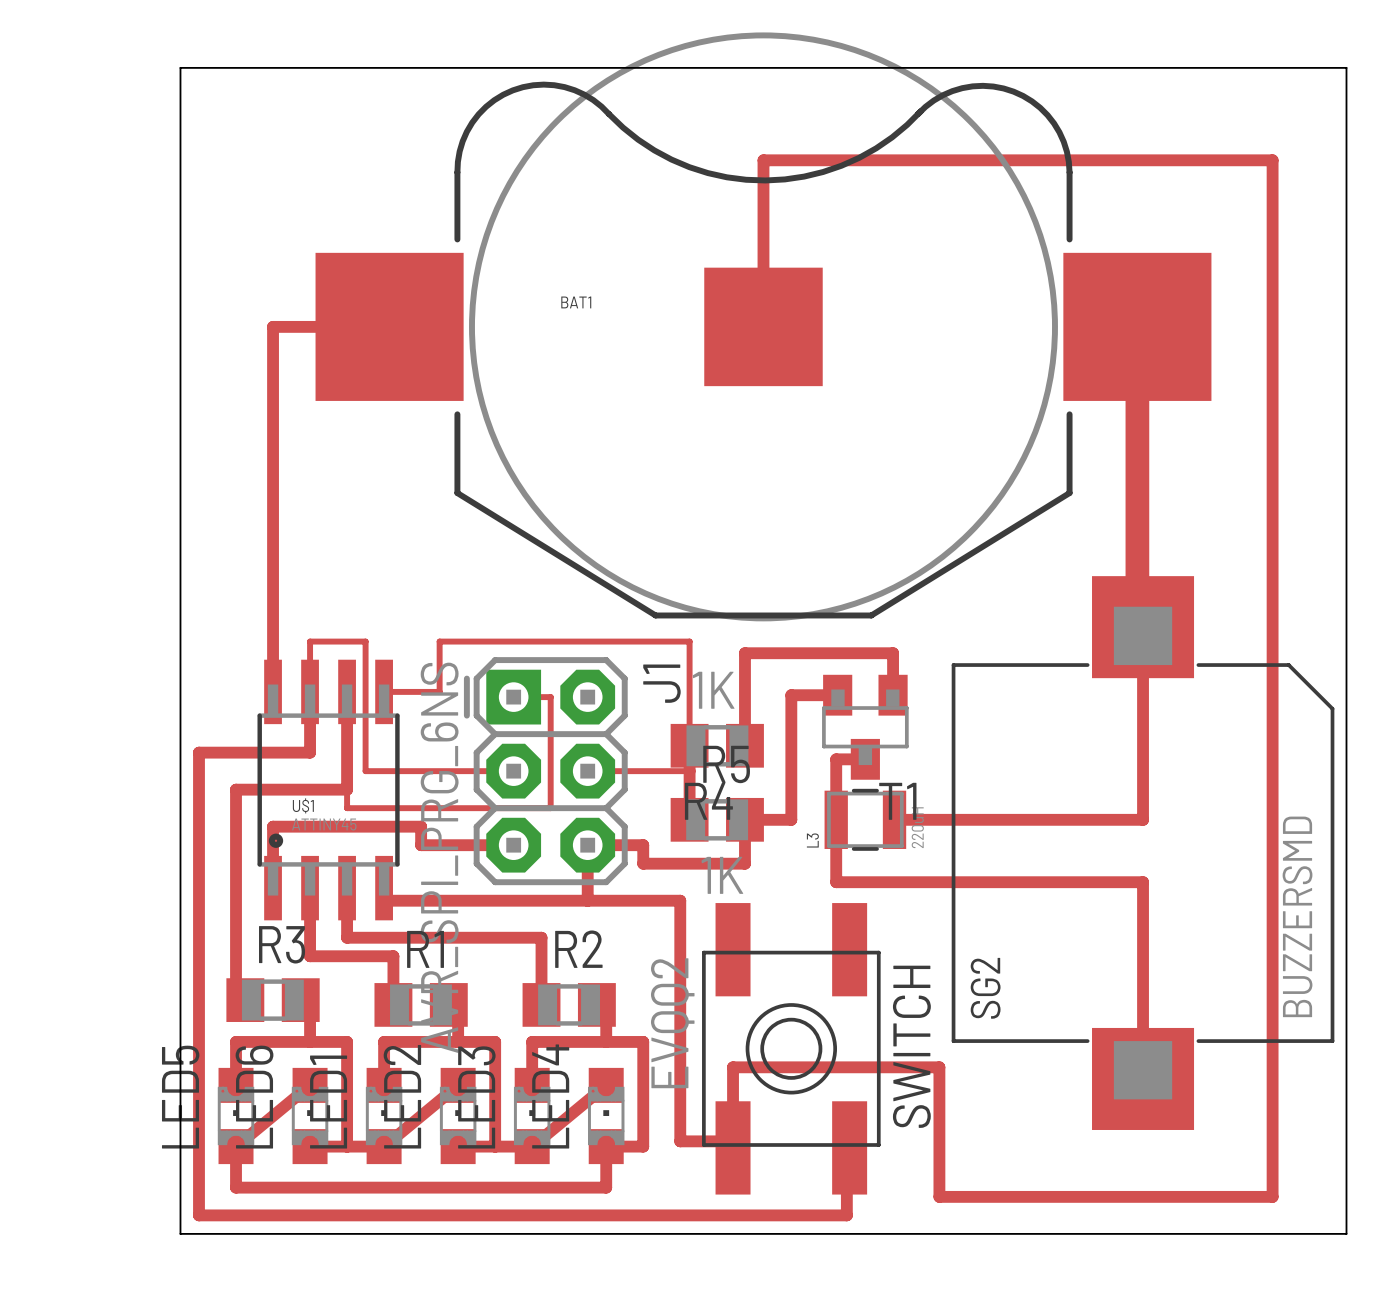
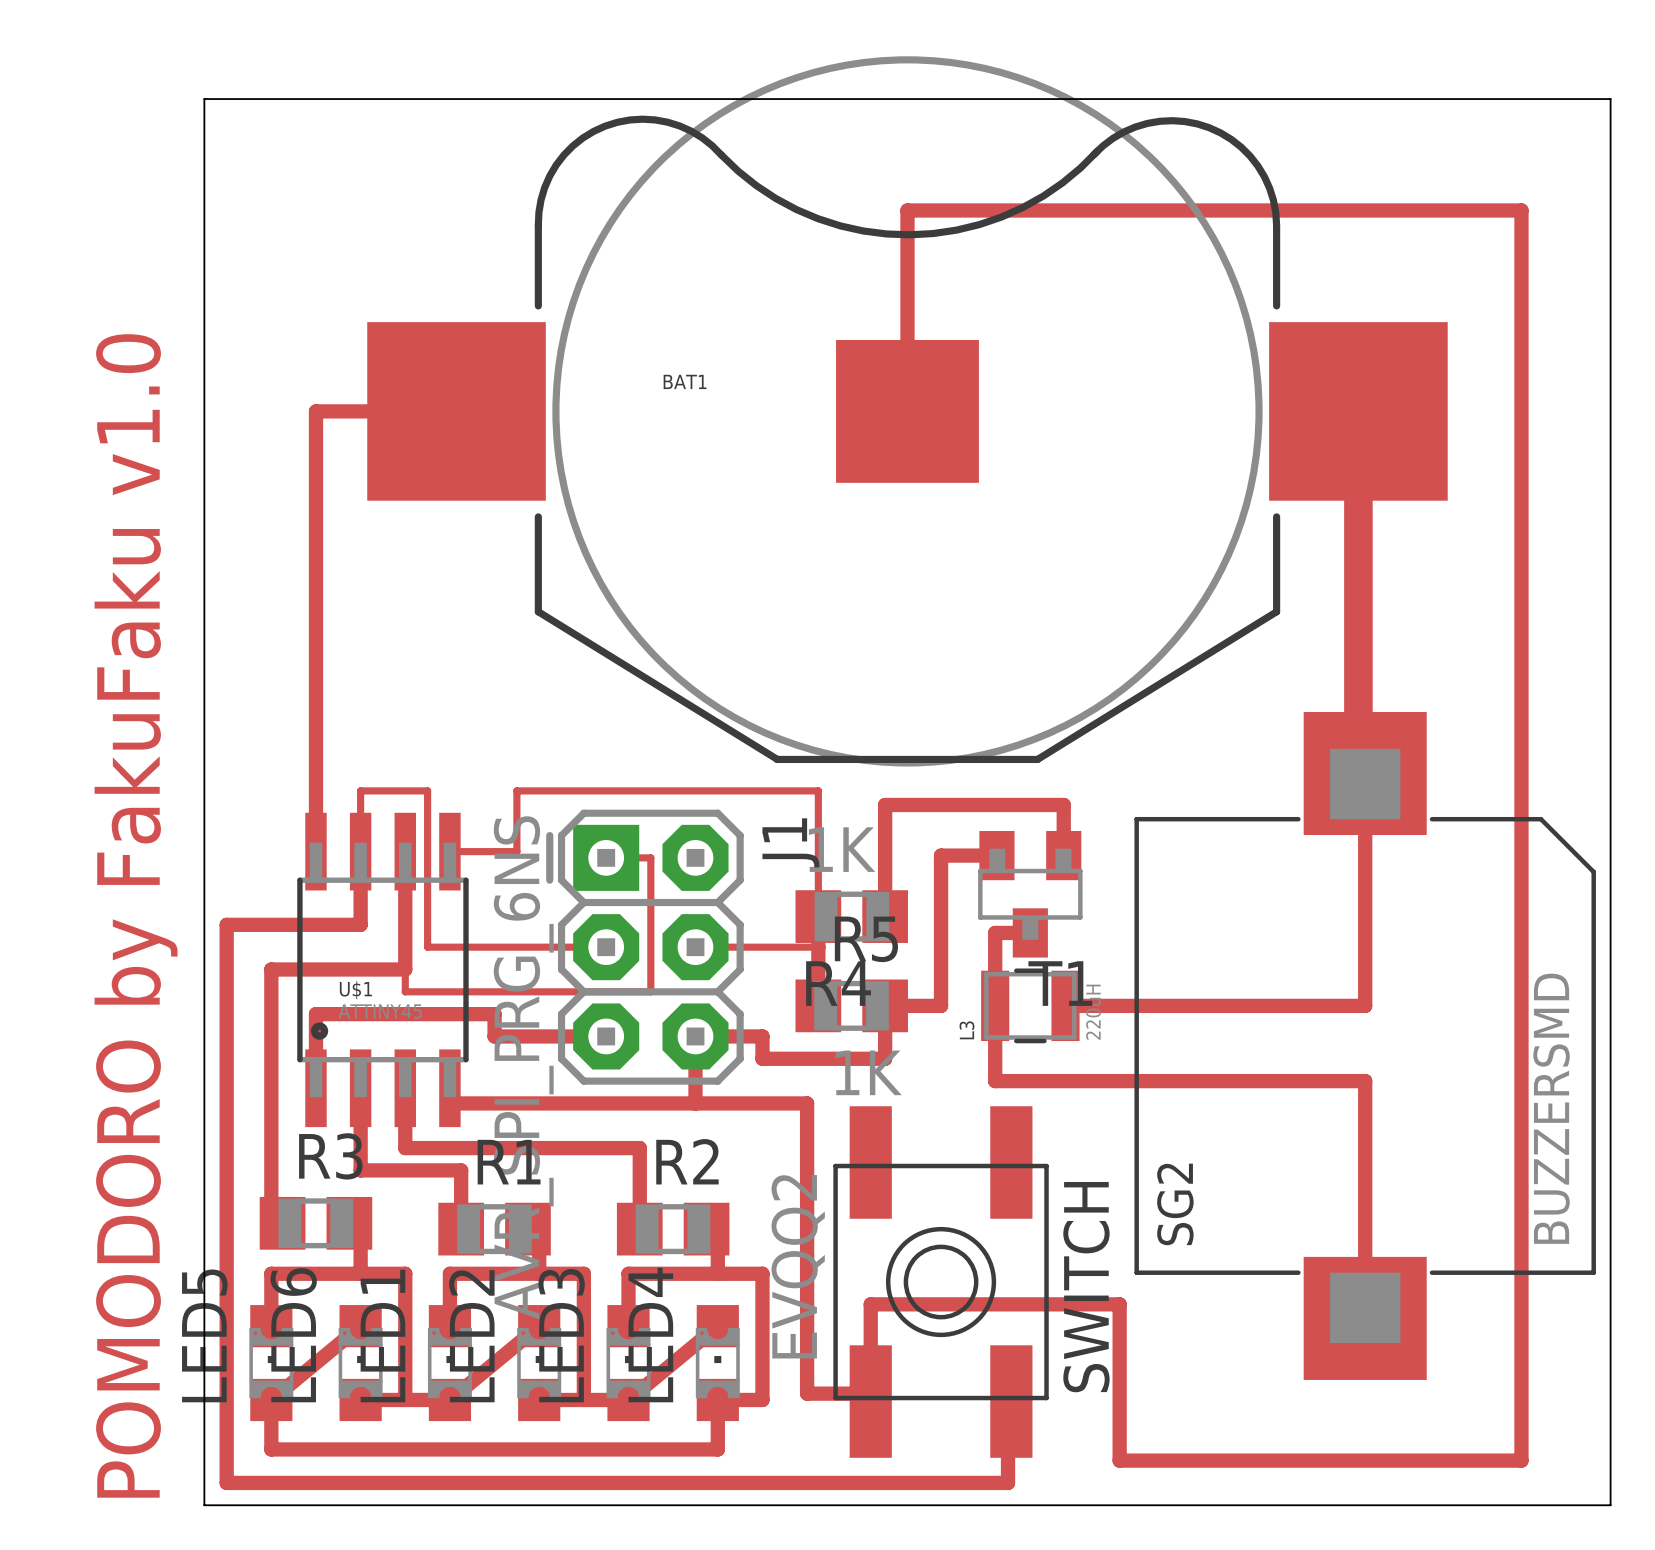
text: none -> POMODORO by FakuFaku v1.0 (136, 915)

